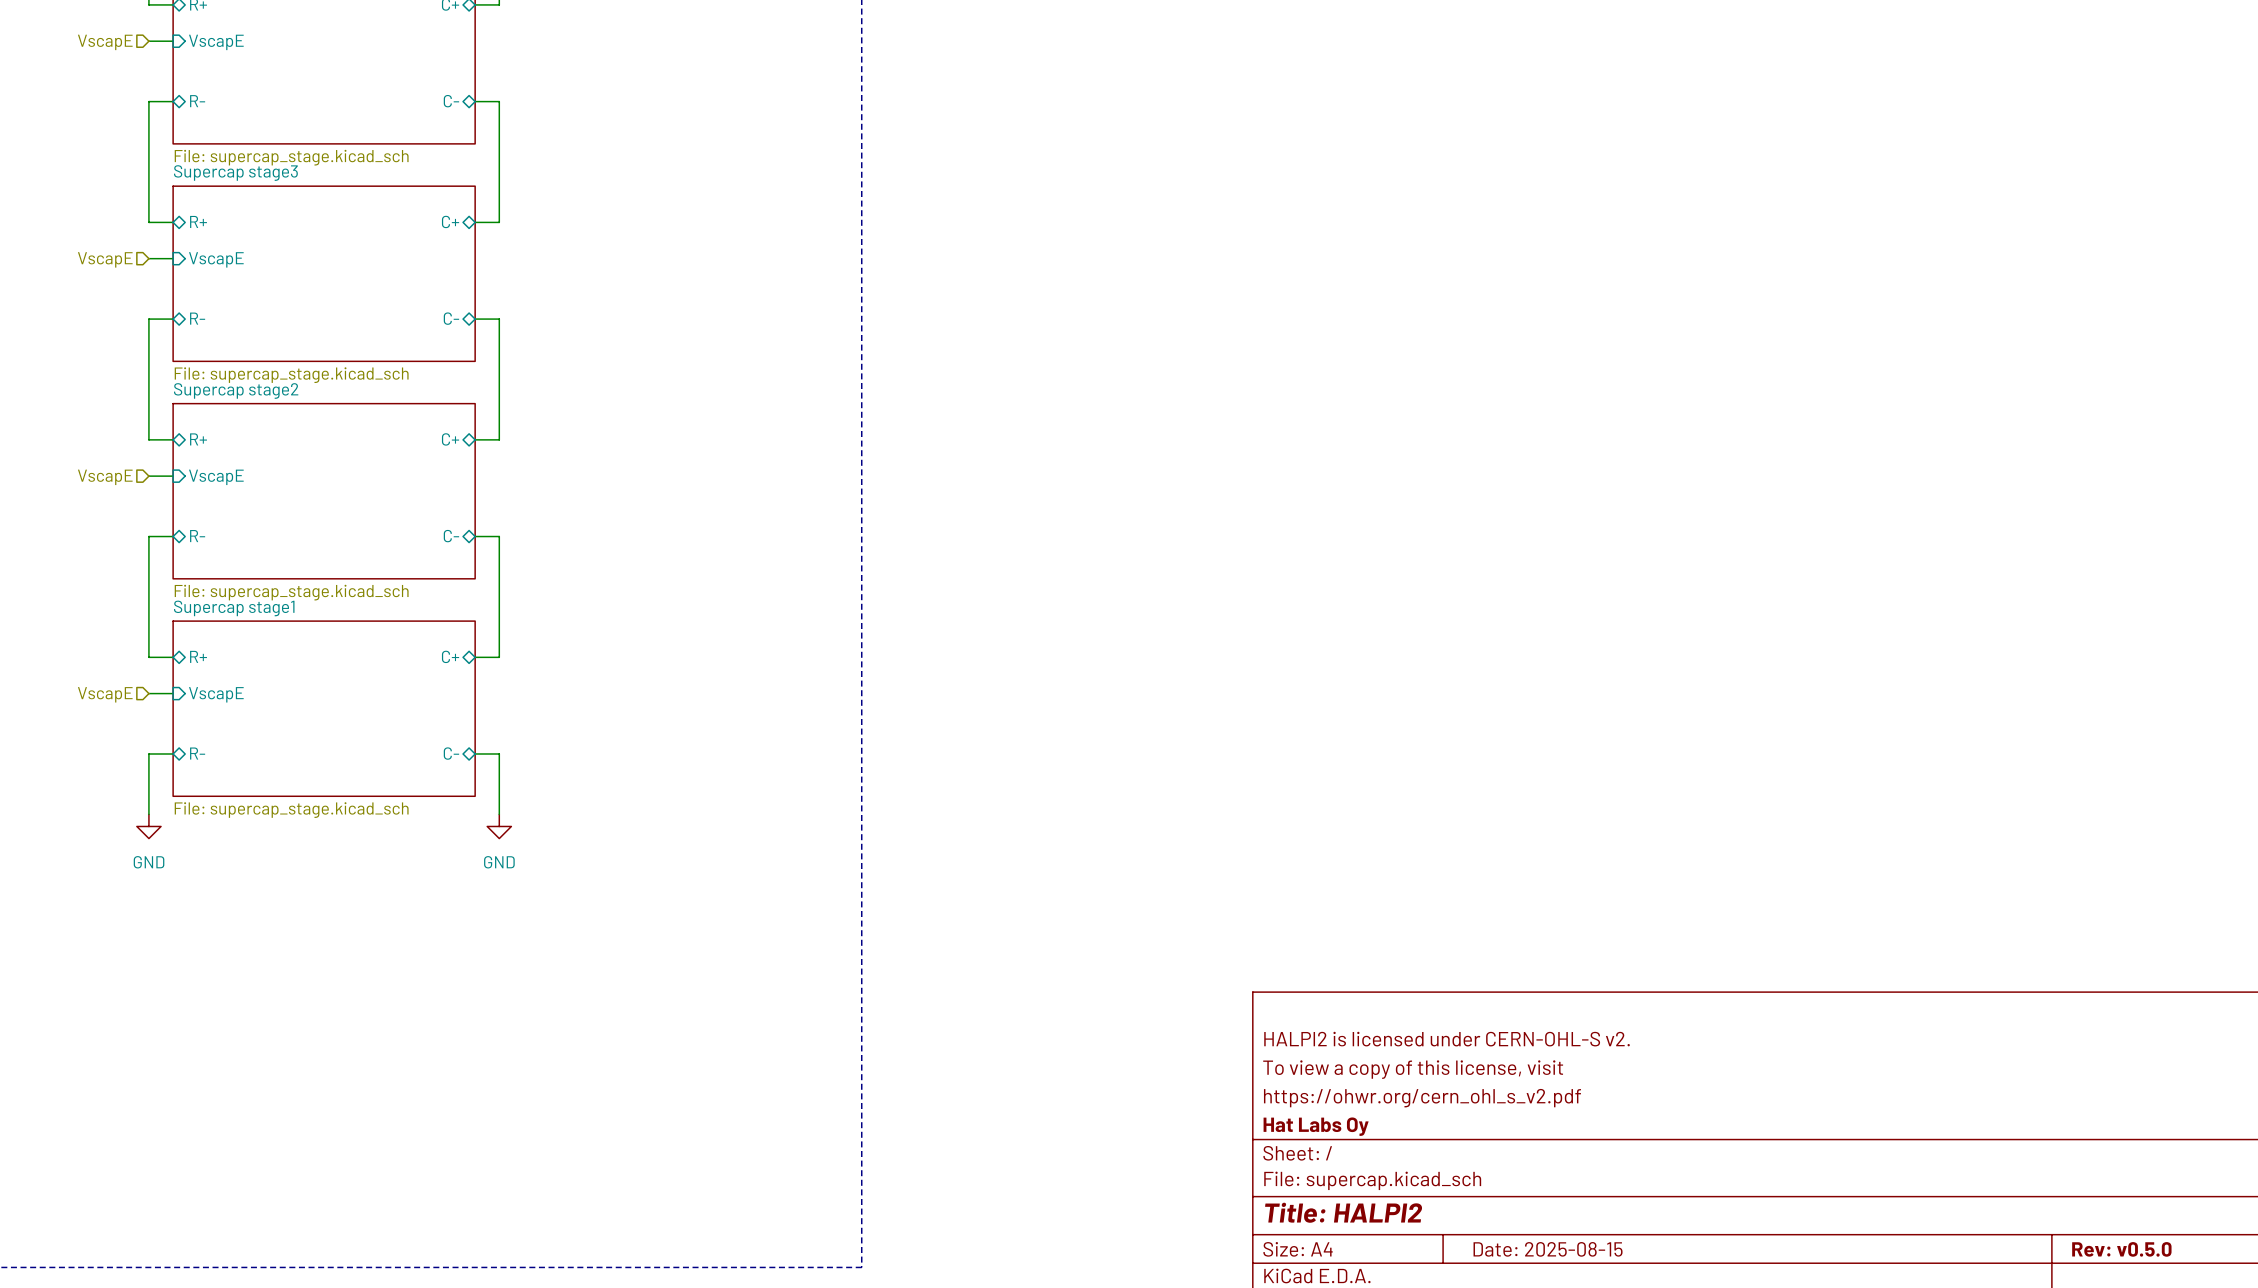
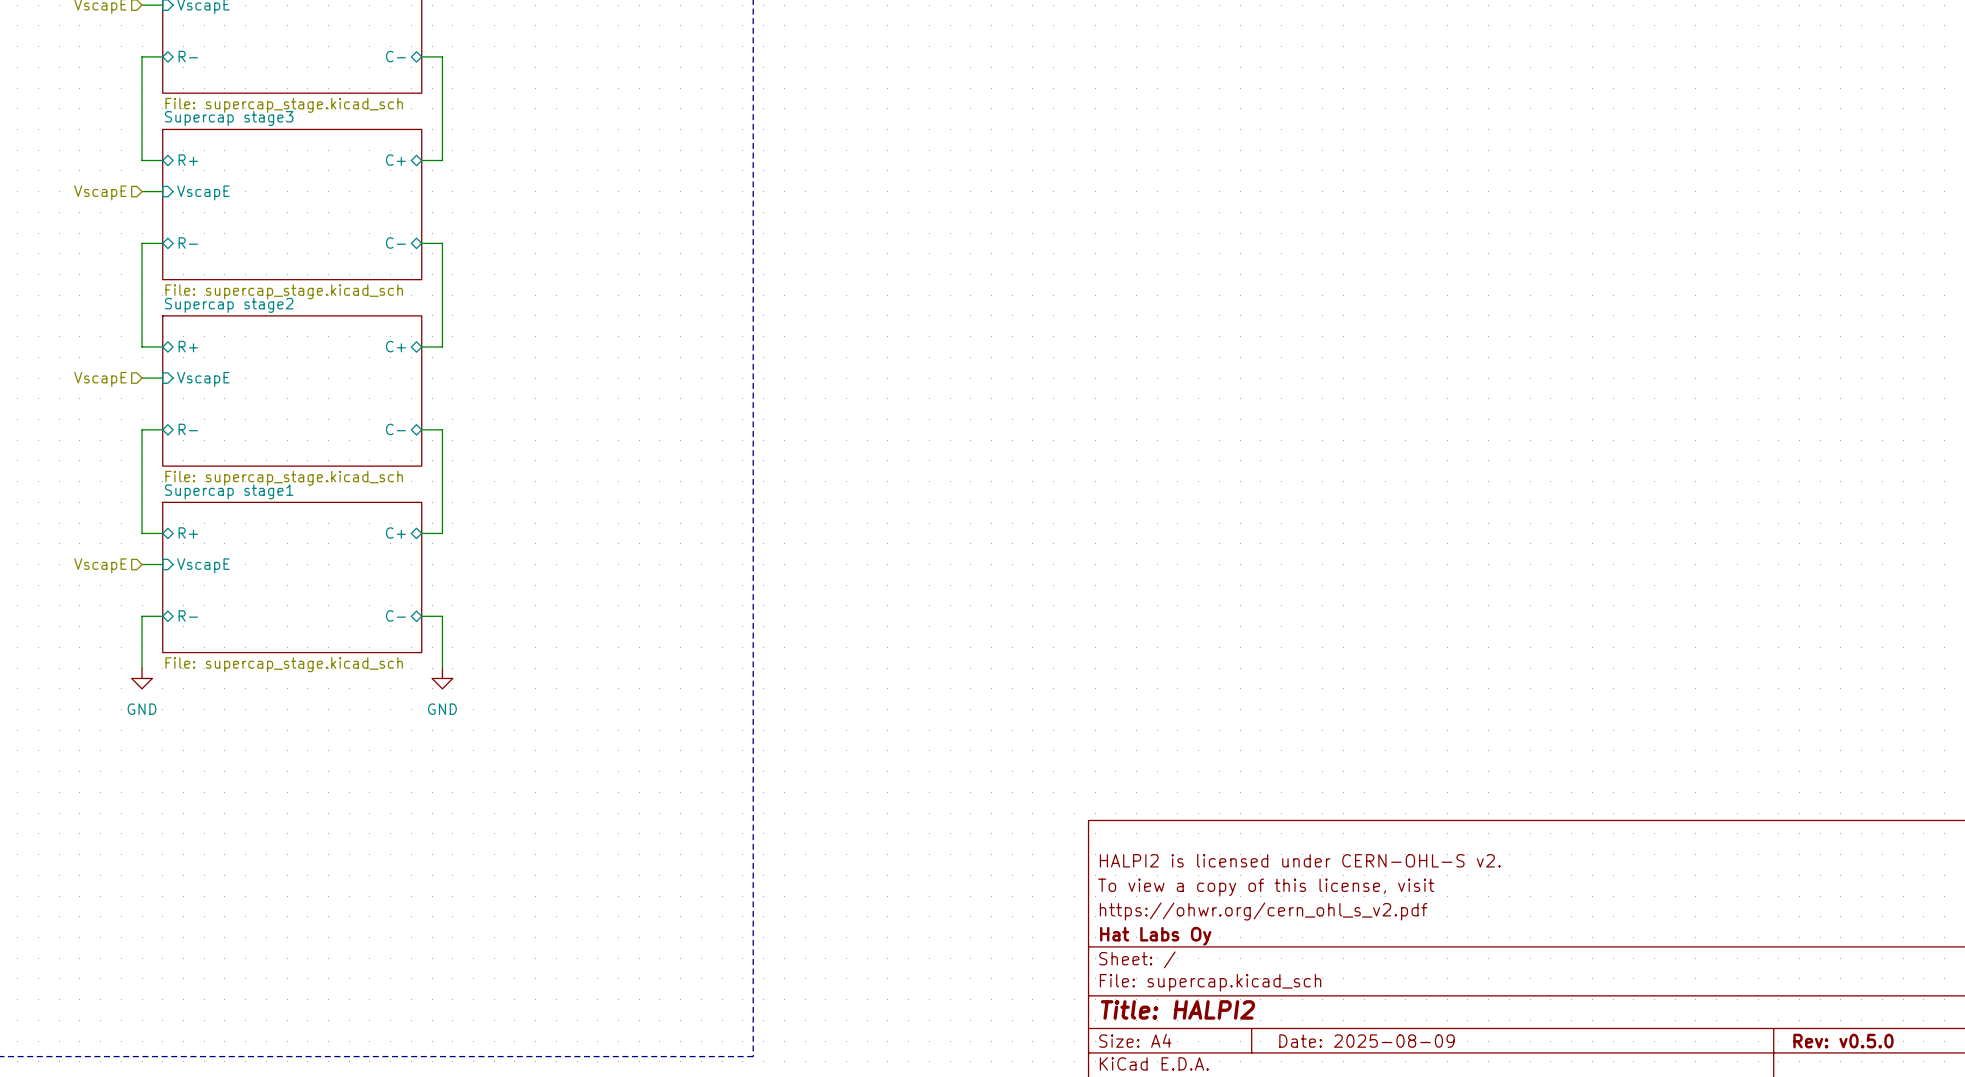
title block: Date: 2025-08-15 (1548, 1249) -> Date: 2025-08-09 (1366, 1041)

